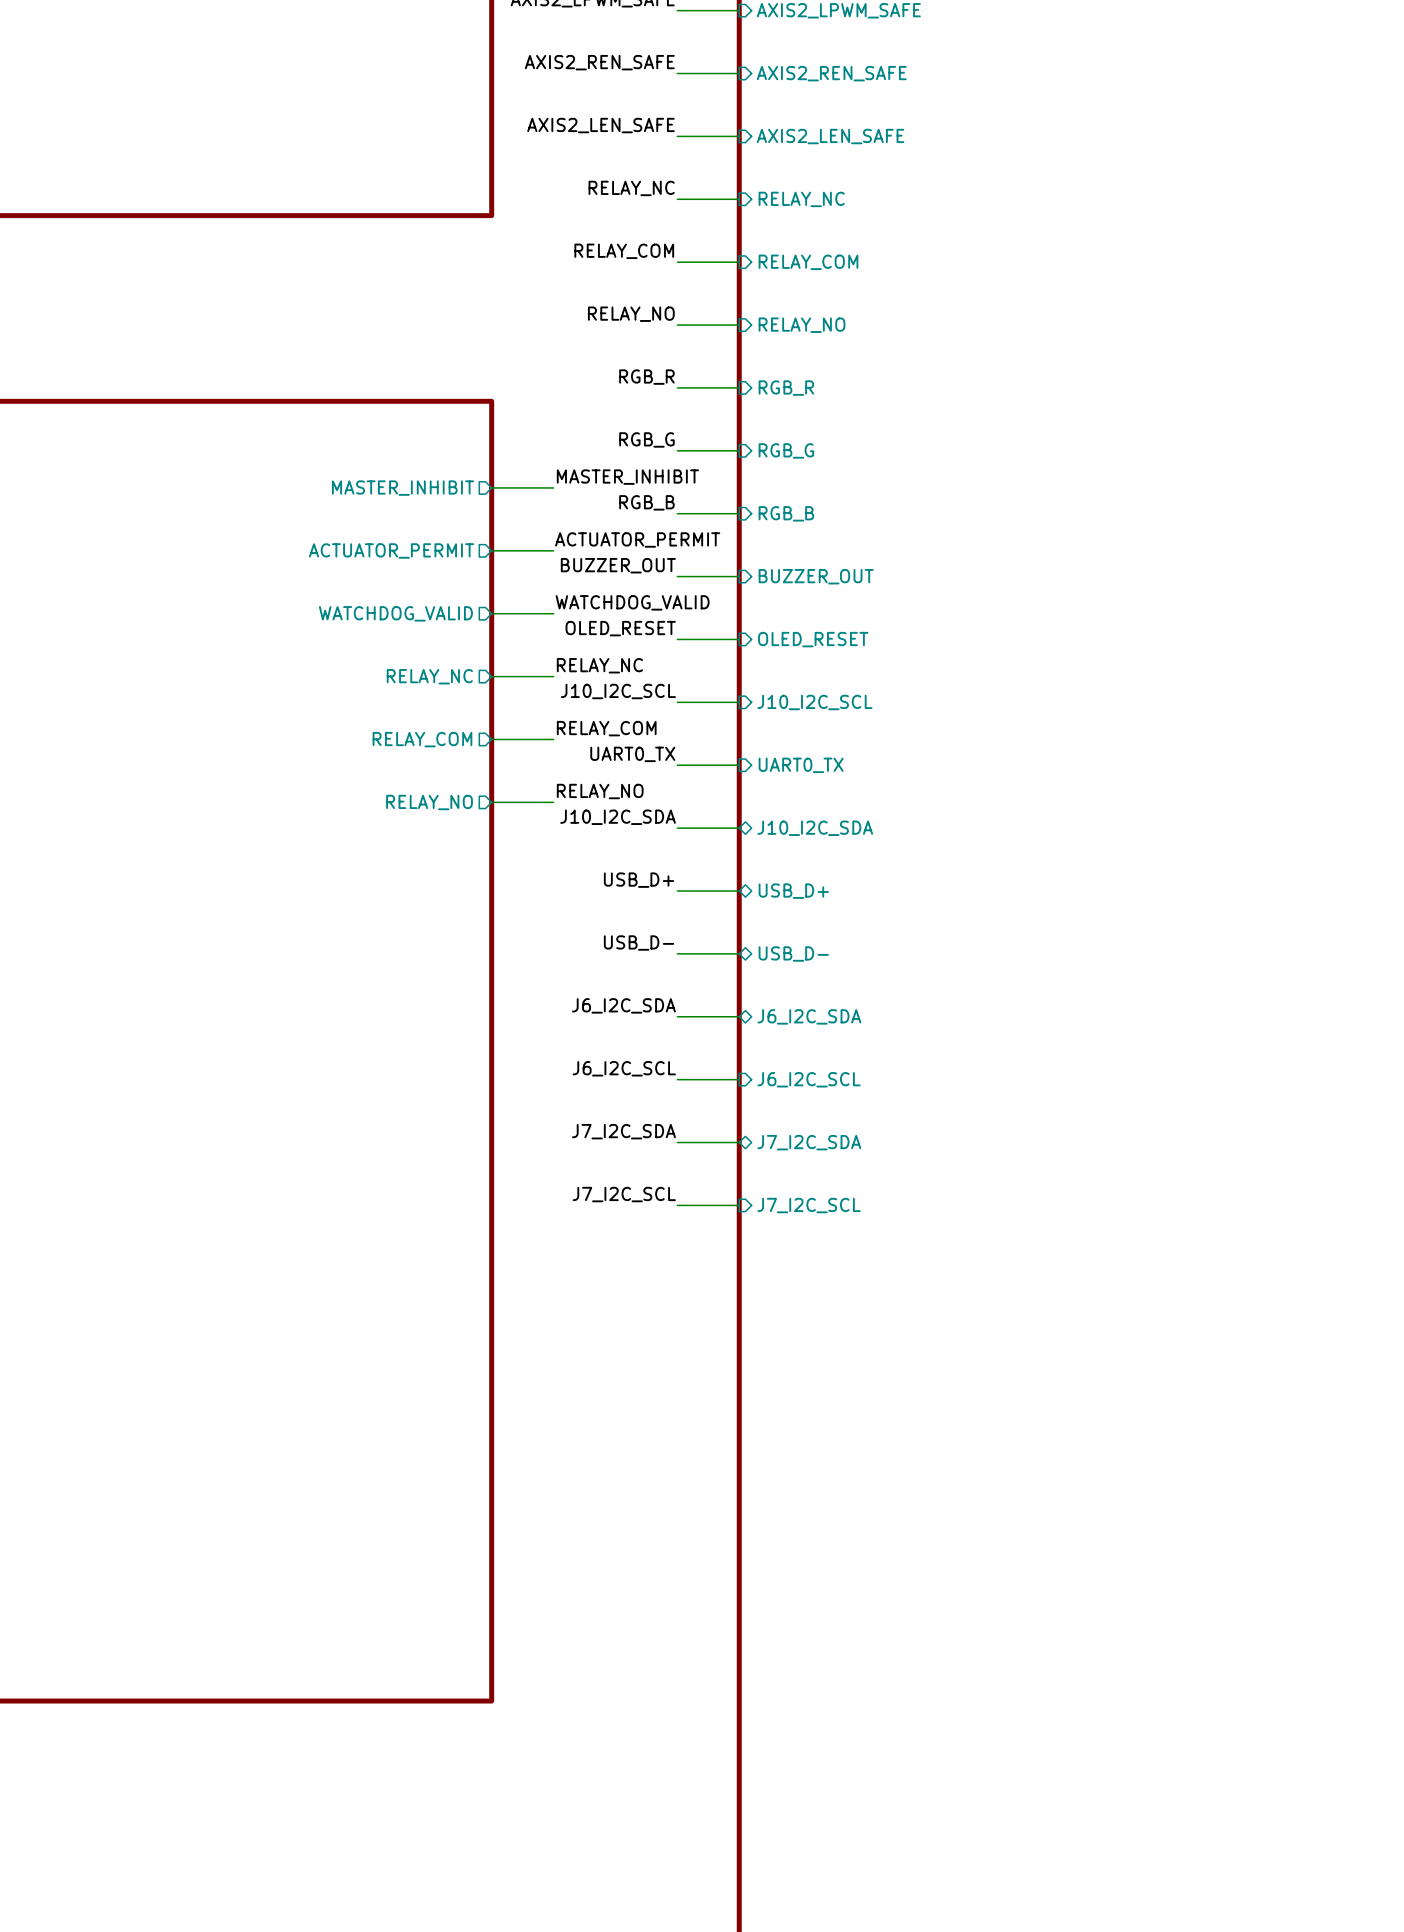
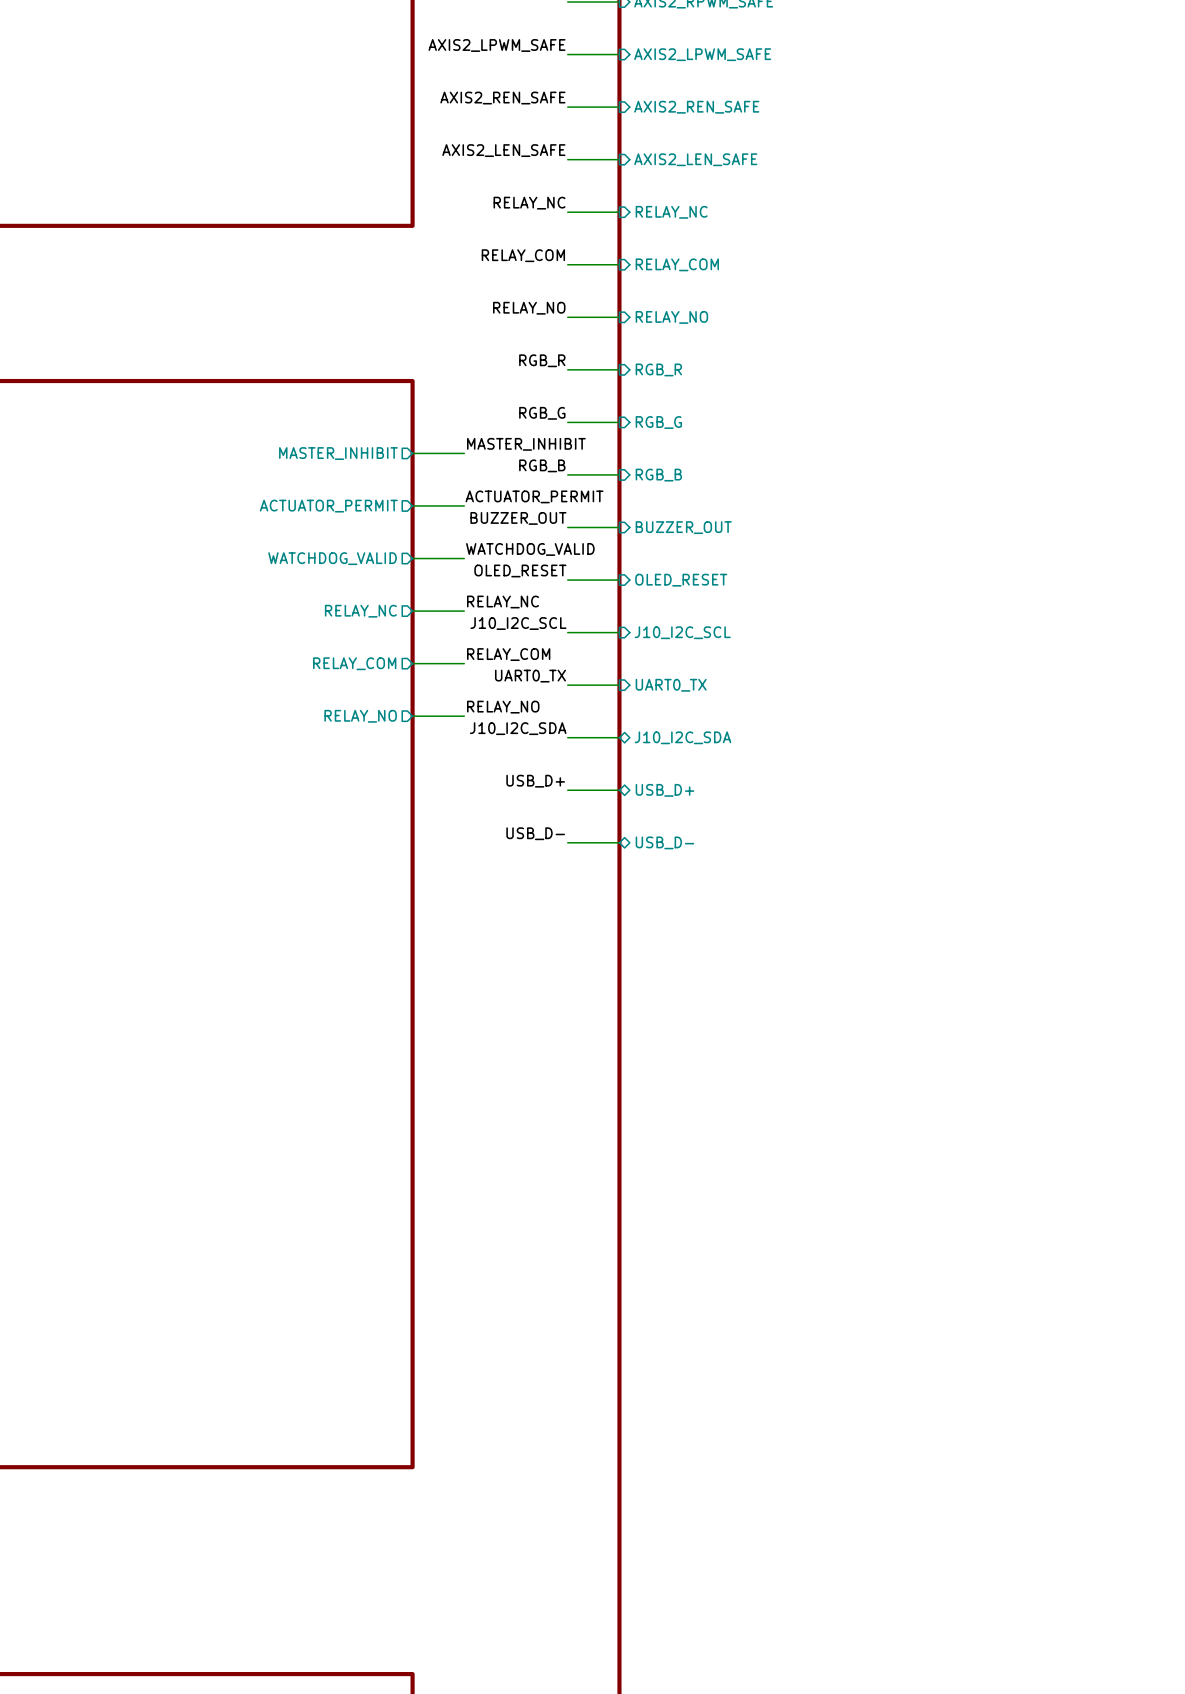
label: J6_I2C_SDA (623, 1005) -> none
wire: (677, 1016) (739, 1016) -> none
sheet pin: J6_I2C_SDA (809, 1016) -> none
label: J6_I2C_SCL (624, 1068) -> none
wire: (677, 1079) (739, 1079) -> none
sheet pin: J6_I2C_SCL (809, 1079) -> none
label: J7_I2C_SDA (623, 1131) -> none
wire: (677, 1142) (739, 1142) -> none
sheet pin: J7_I2C_SDA (809, 1142) -> none
label: J7_I2C_SCL (624, 1194) -> none
wire: (677, 1205) (739, 1205) -> none
sheet pin: J7_I2C_SCL (809, 1205) -> none

